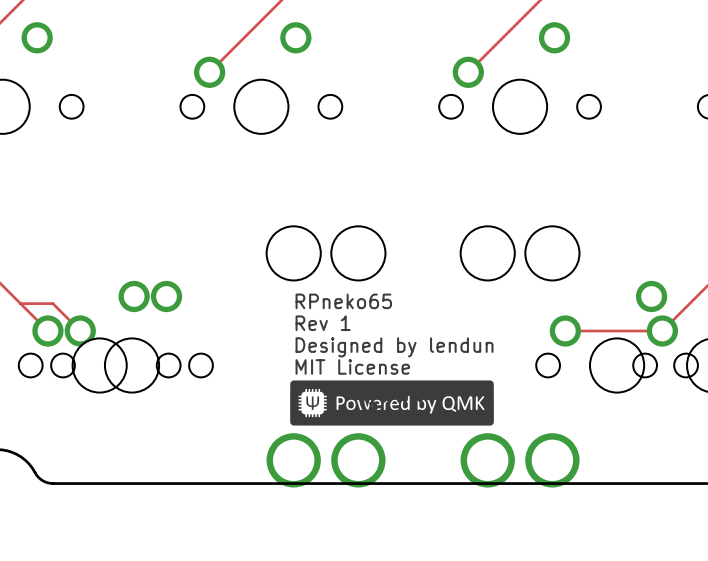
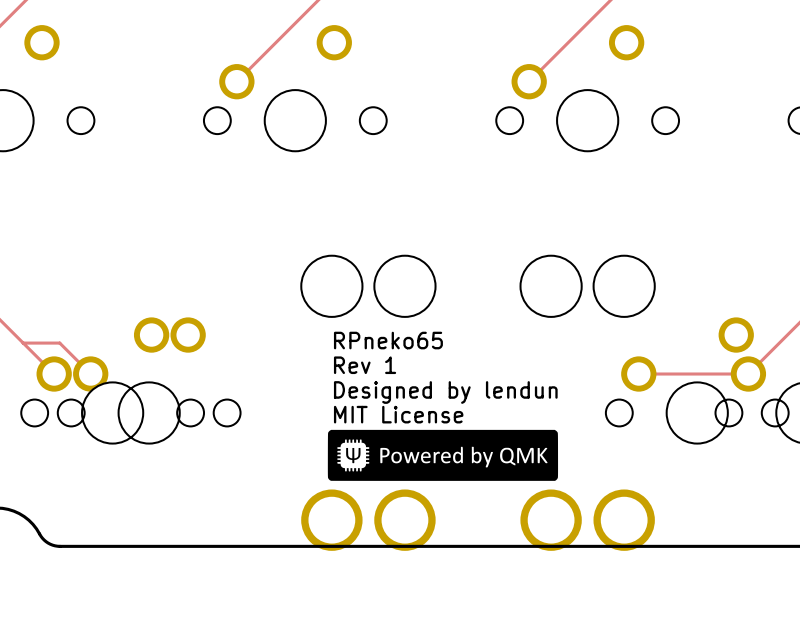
drawing: none -> [327, 429, 559, 481]
part: (392, 403) -> none

